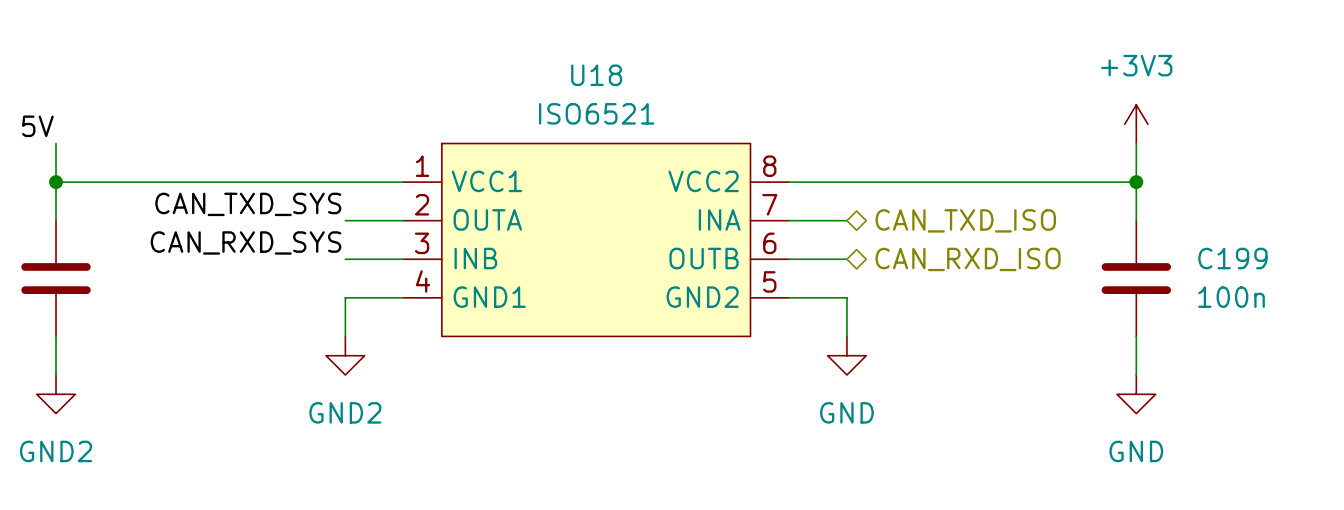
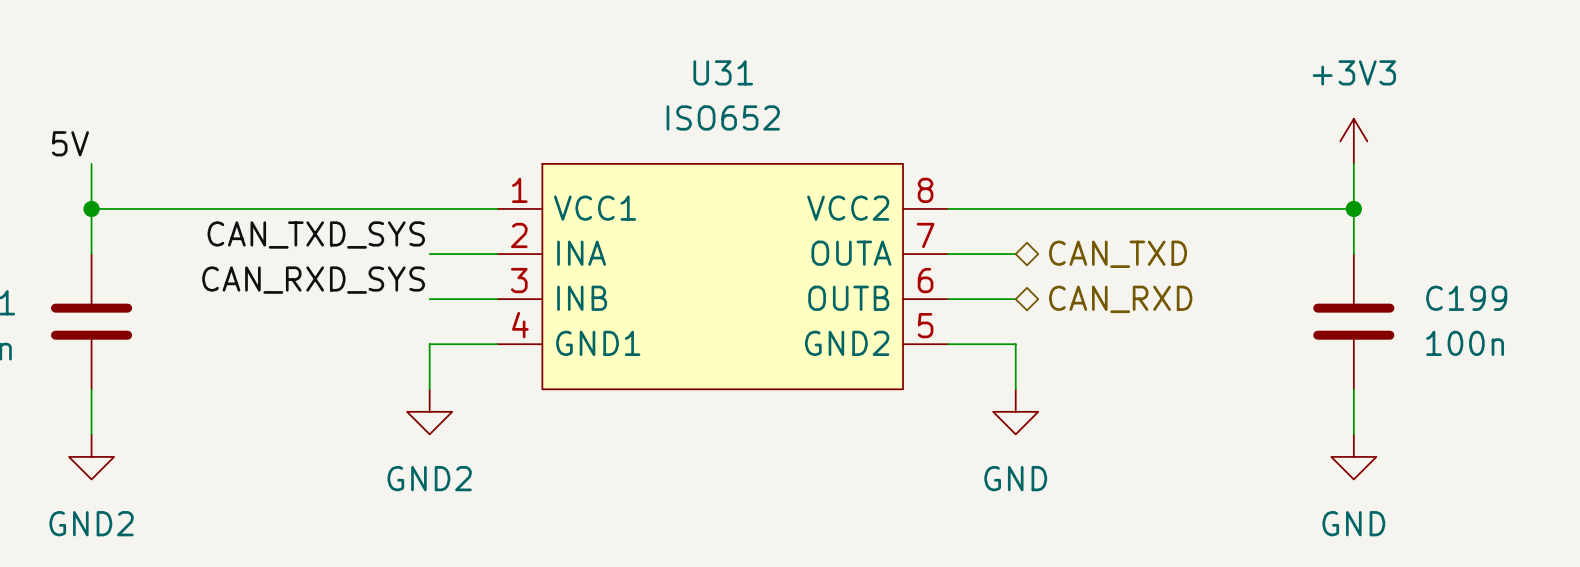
U18 name: U18 (596, 75) -> U31 (723, 72)
U18 value: ISO6521 (596, 113) -> ISO652 (723, 117)
U18 pin name: OUTA (487, 219) -> INA (581, 253)
U18 pin name: INA (719, 219) -> OUTA (851, 253)
hierarchical label: CAN_TXD_ISO (965, 220) -> CAN_TXD (1118, 254)
hierarchical label: CAN_RXD_ISO (968, 259) -> CAN_RXD (1120, 299)

